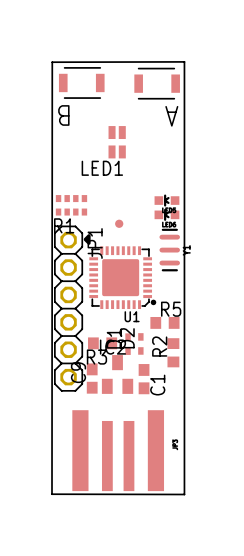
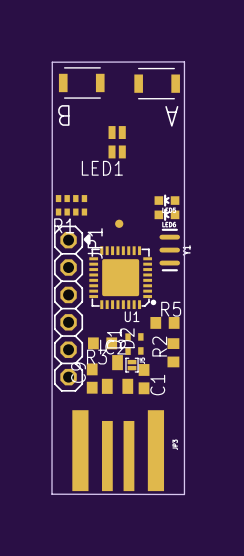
part: none -> (132, 365)

